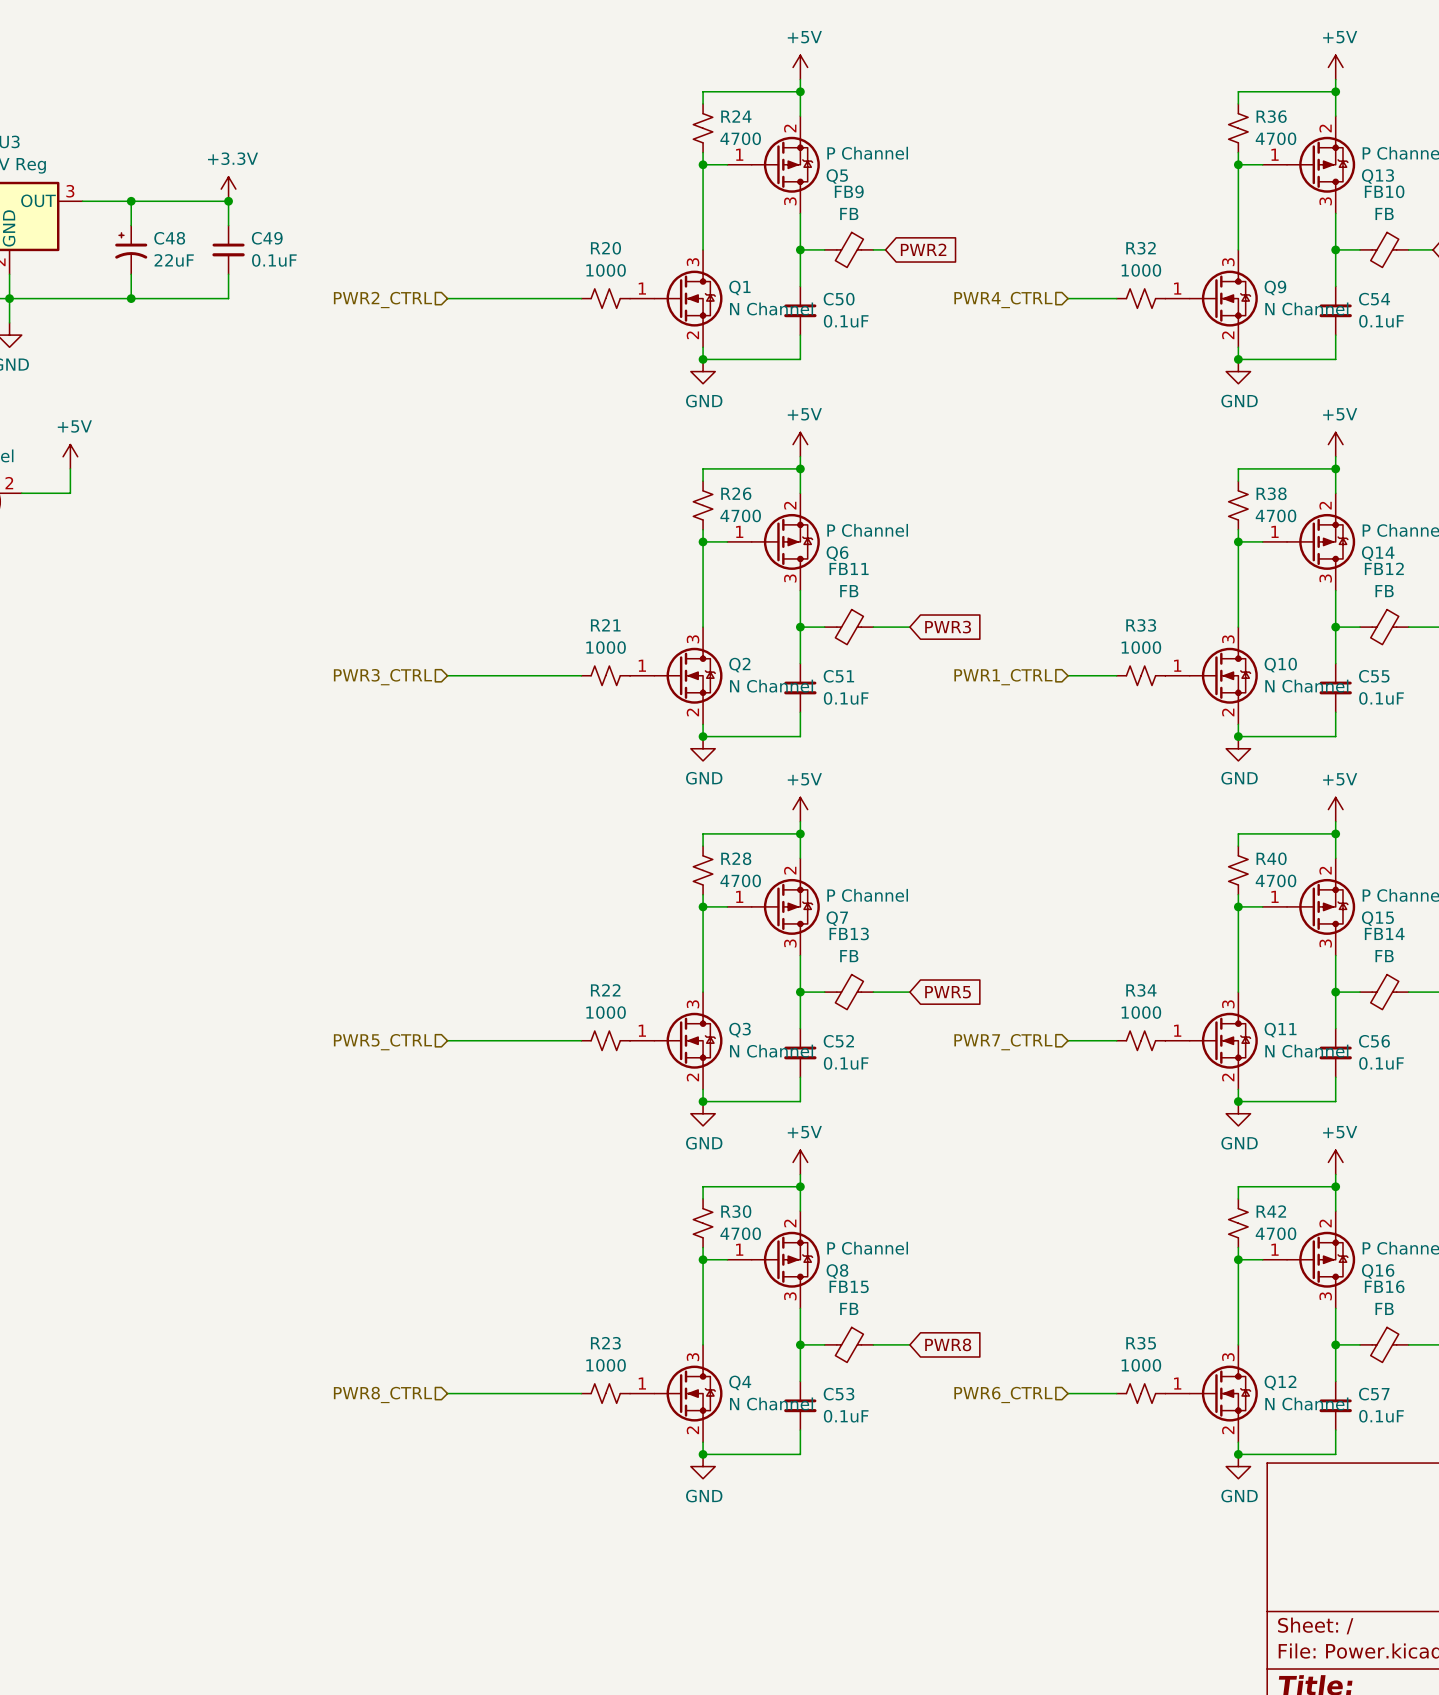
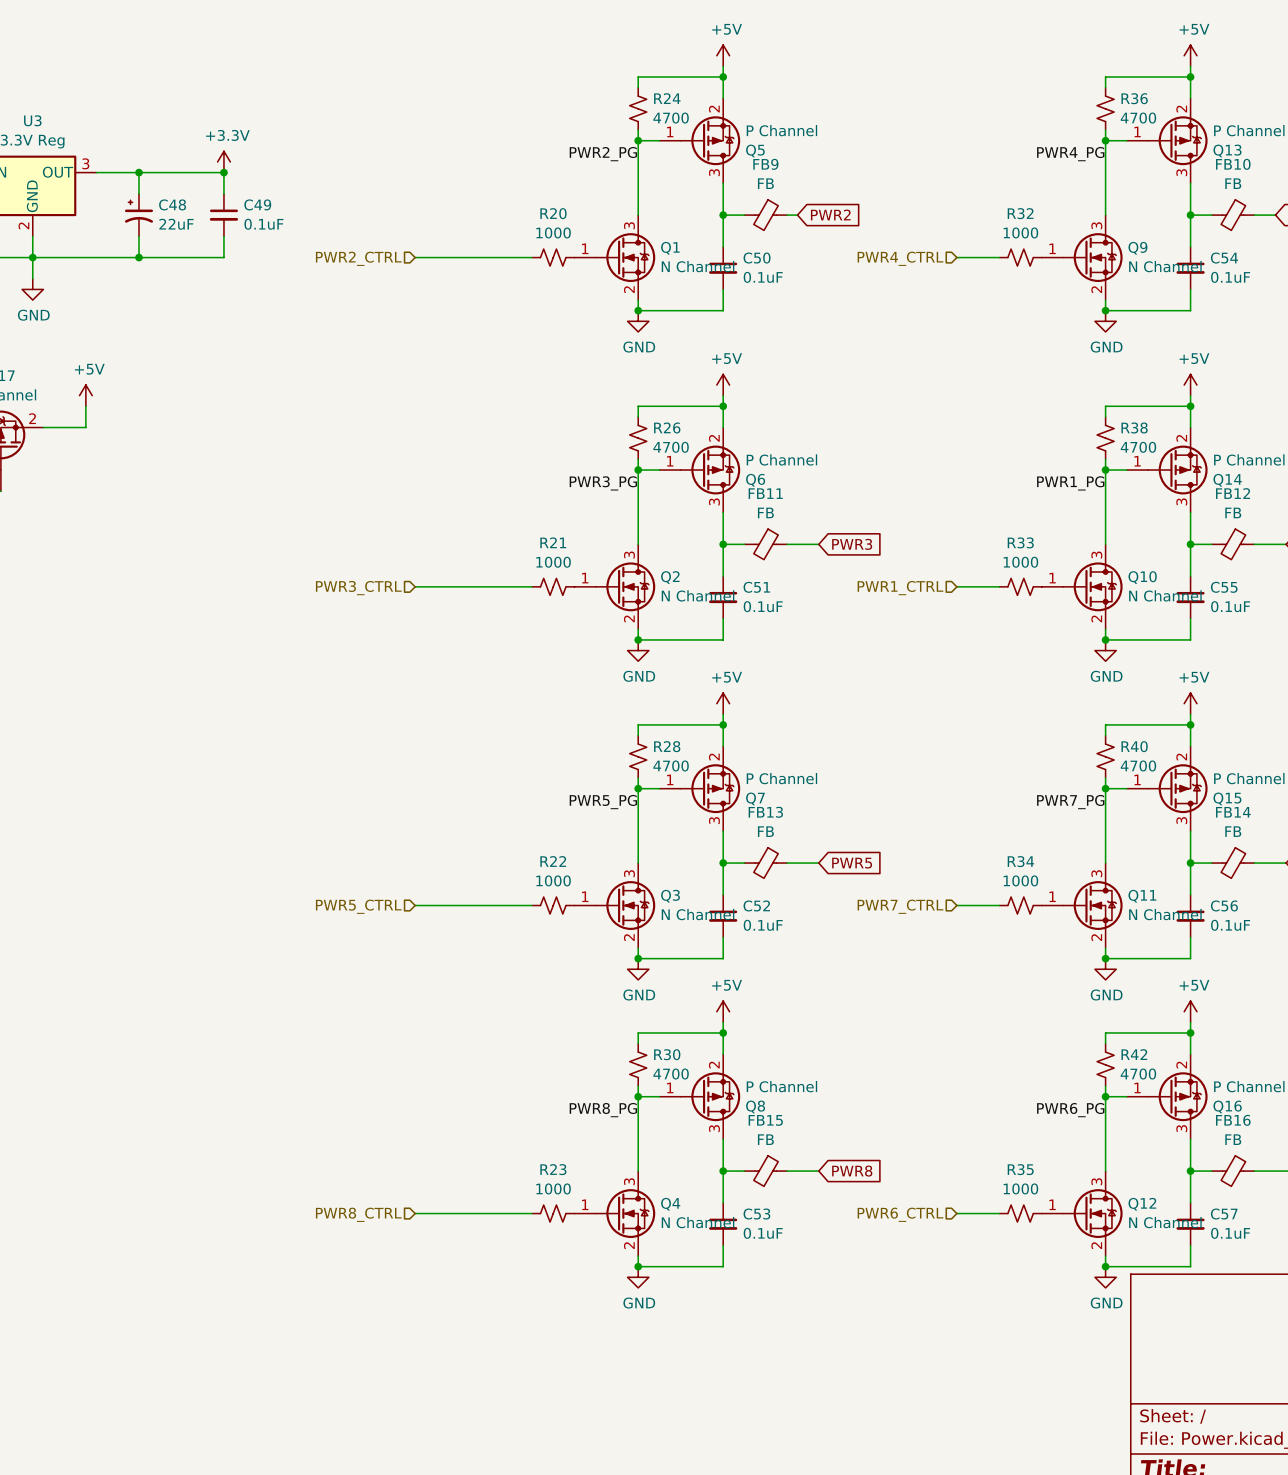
label: none -> PWR2_PG (603, 154)
label: none -> PWR4_PG (1070, 154)
label: none -> PWR3_PG (603, 483)
label: none -> PWR1_PG (1070, 483)
label: none -> PWR5_PG (603, 802)
label: none -> PWR7_PG (1070, 802)
label: none -> PWR8_PG (603, 1110)
label: none -> PWR6_PG (1070, 1110)

